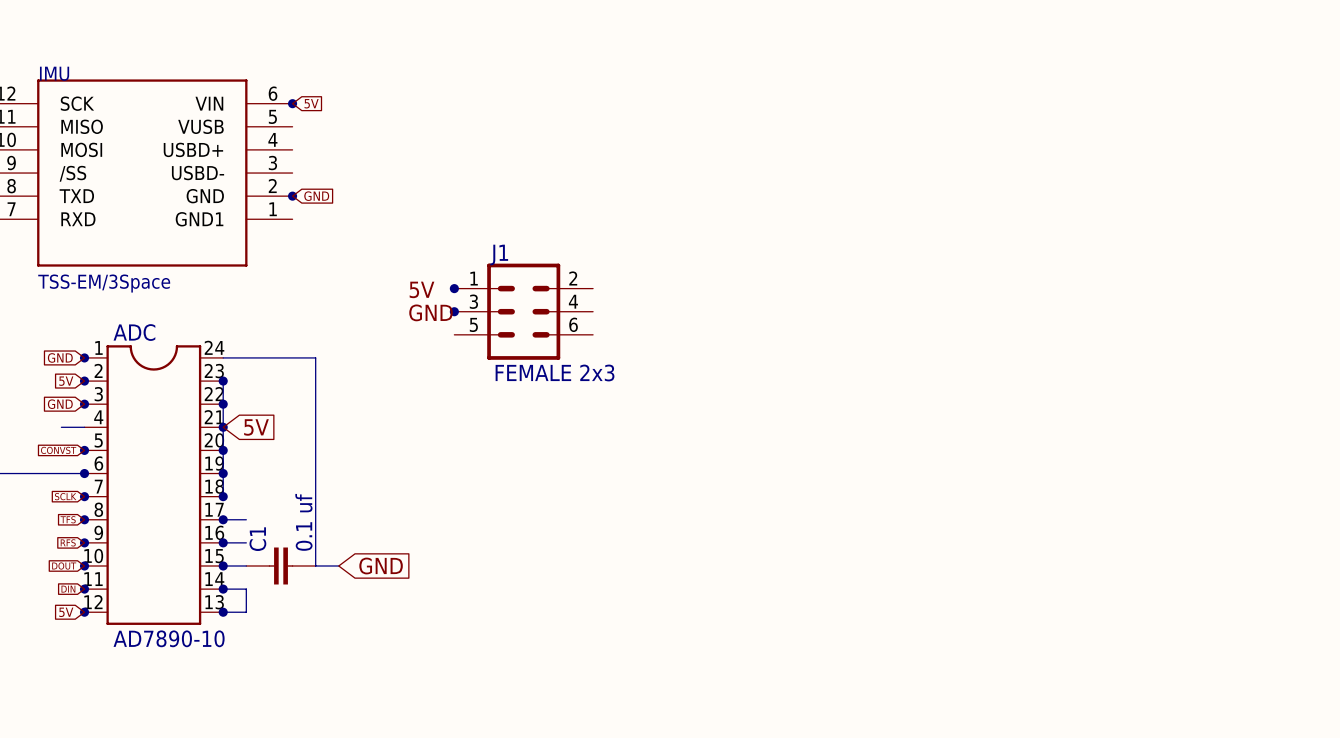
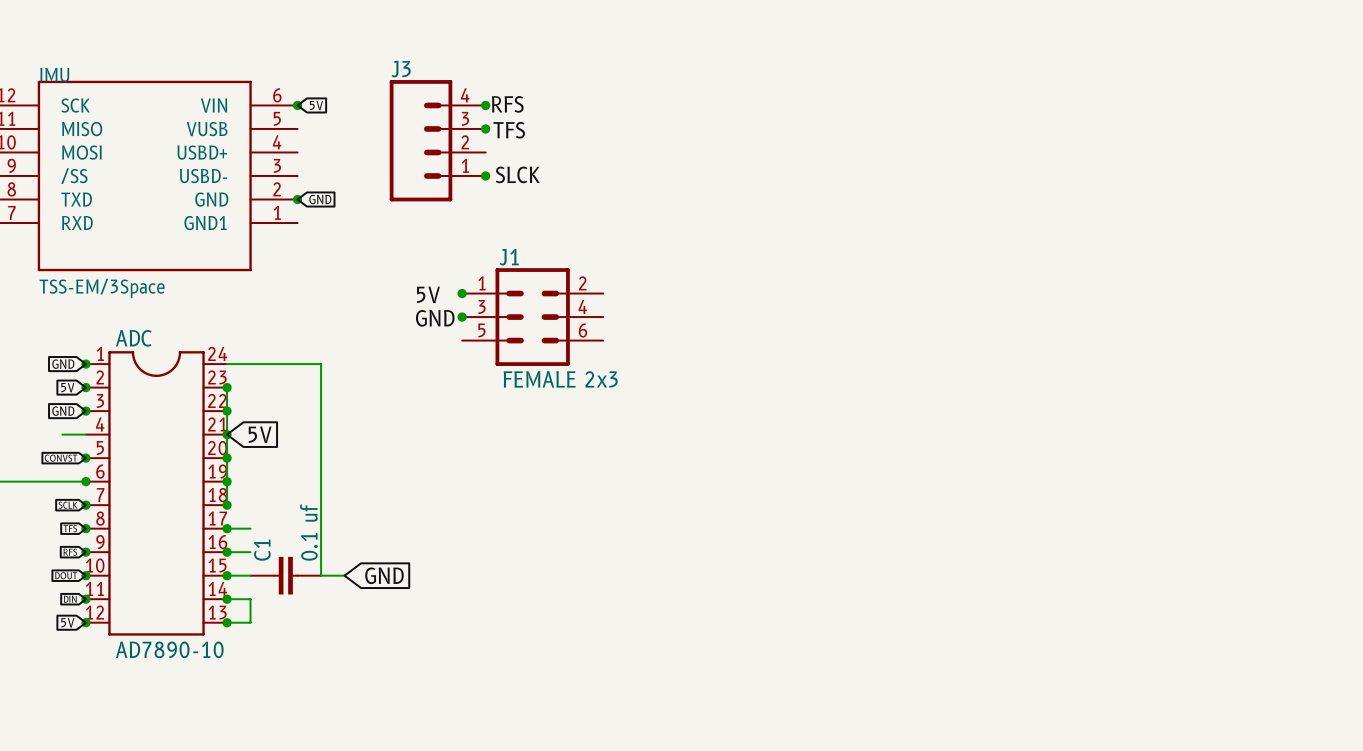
label: none -> RFS (507, 104)
junction: none -> (485, 105)
junction: none -> (485, 128)
label: none -> TFS (509, 130)
J3: none -> (437, 140)
label: none -> SLCK (517, 174)
junction: none -> (485, 175)

